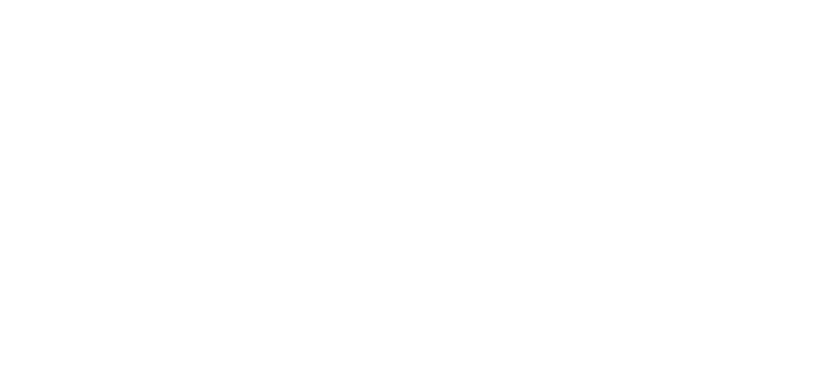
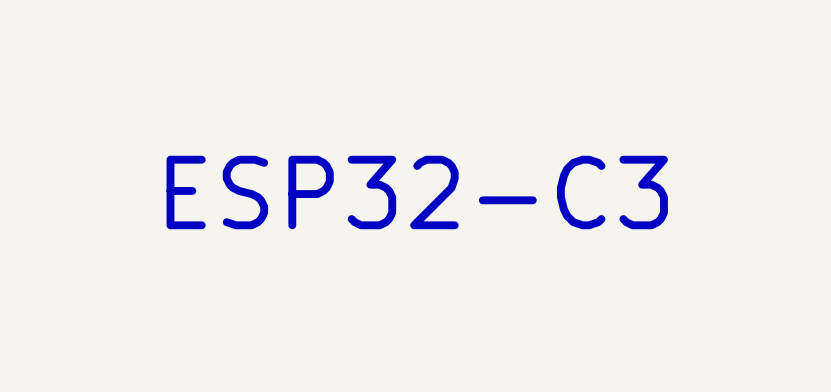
text: none -> ESP32-C3 (417, 192)

